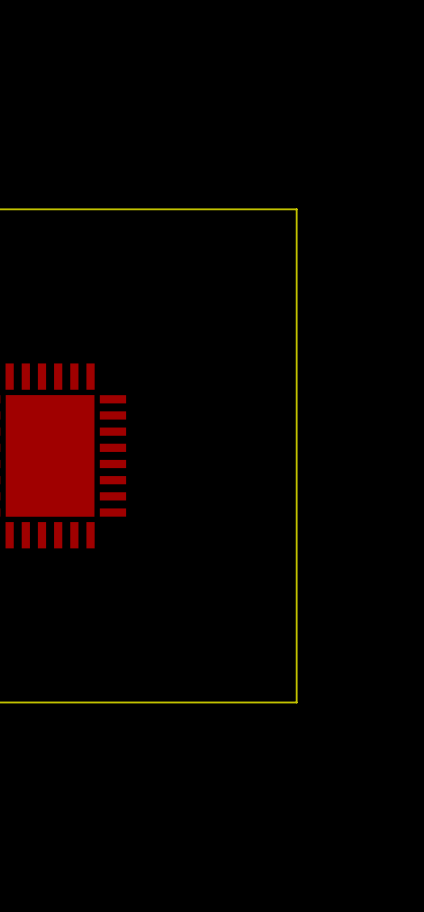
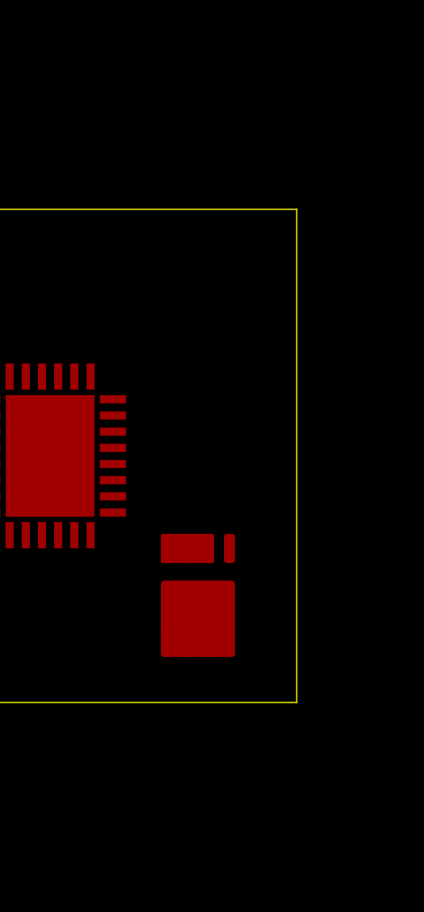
part: none -> (197, 595)

